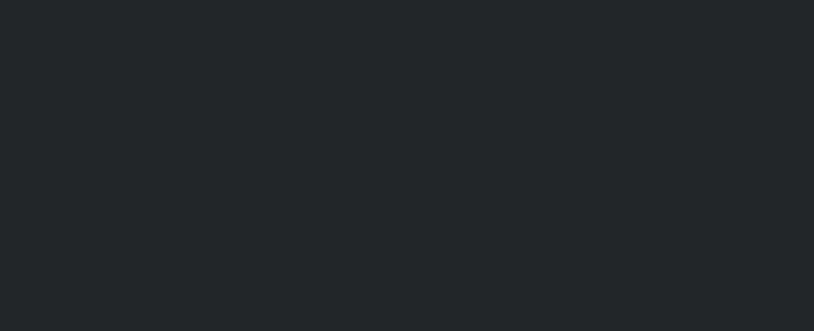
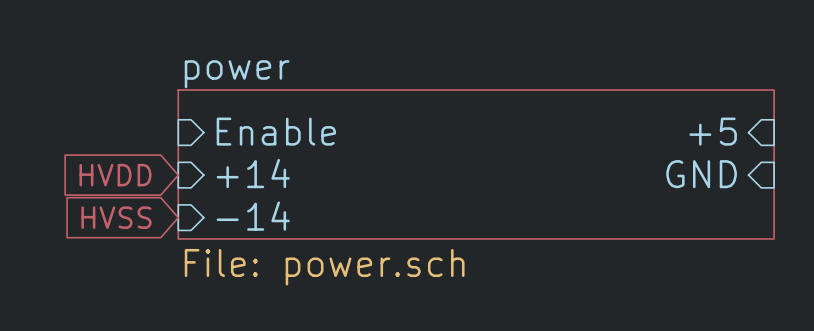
sheet pin: none -> Enable (276, 131)
sheet pin: none -> +5 (713, 131)
sheet power: none -> File: power.sch (476, 164)
sheet pin: none -> +14 (253, 173)
sheet pin: none -> GND (701, 174)
global label: none -> HVDD (115, 175)
sheet pin: none -> -14 (253, 216)
global label: none -> HVSS (116, 217)

